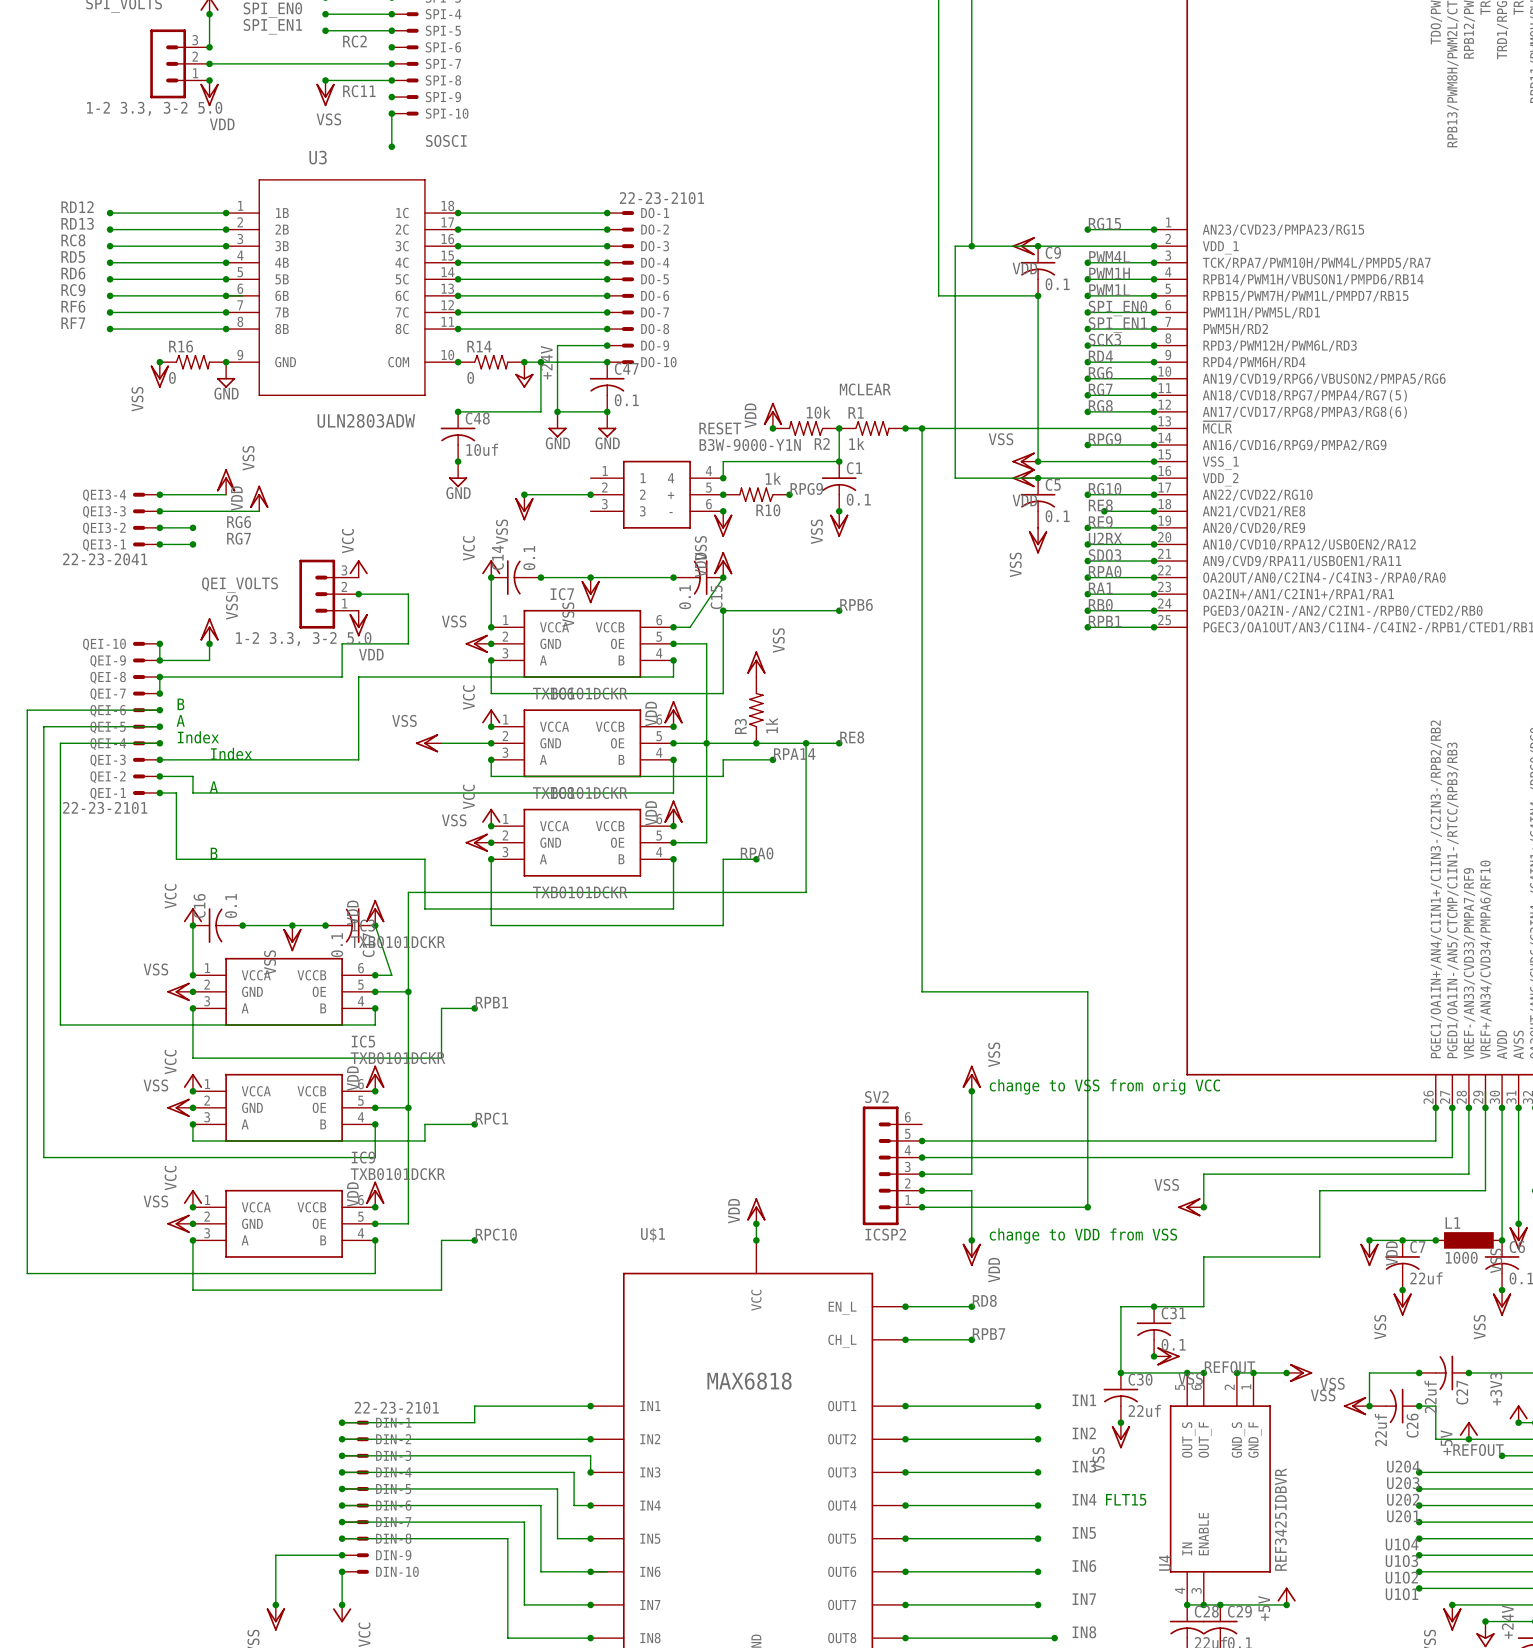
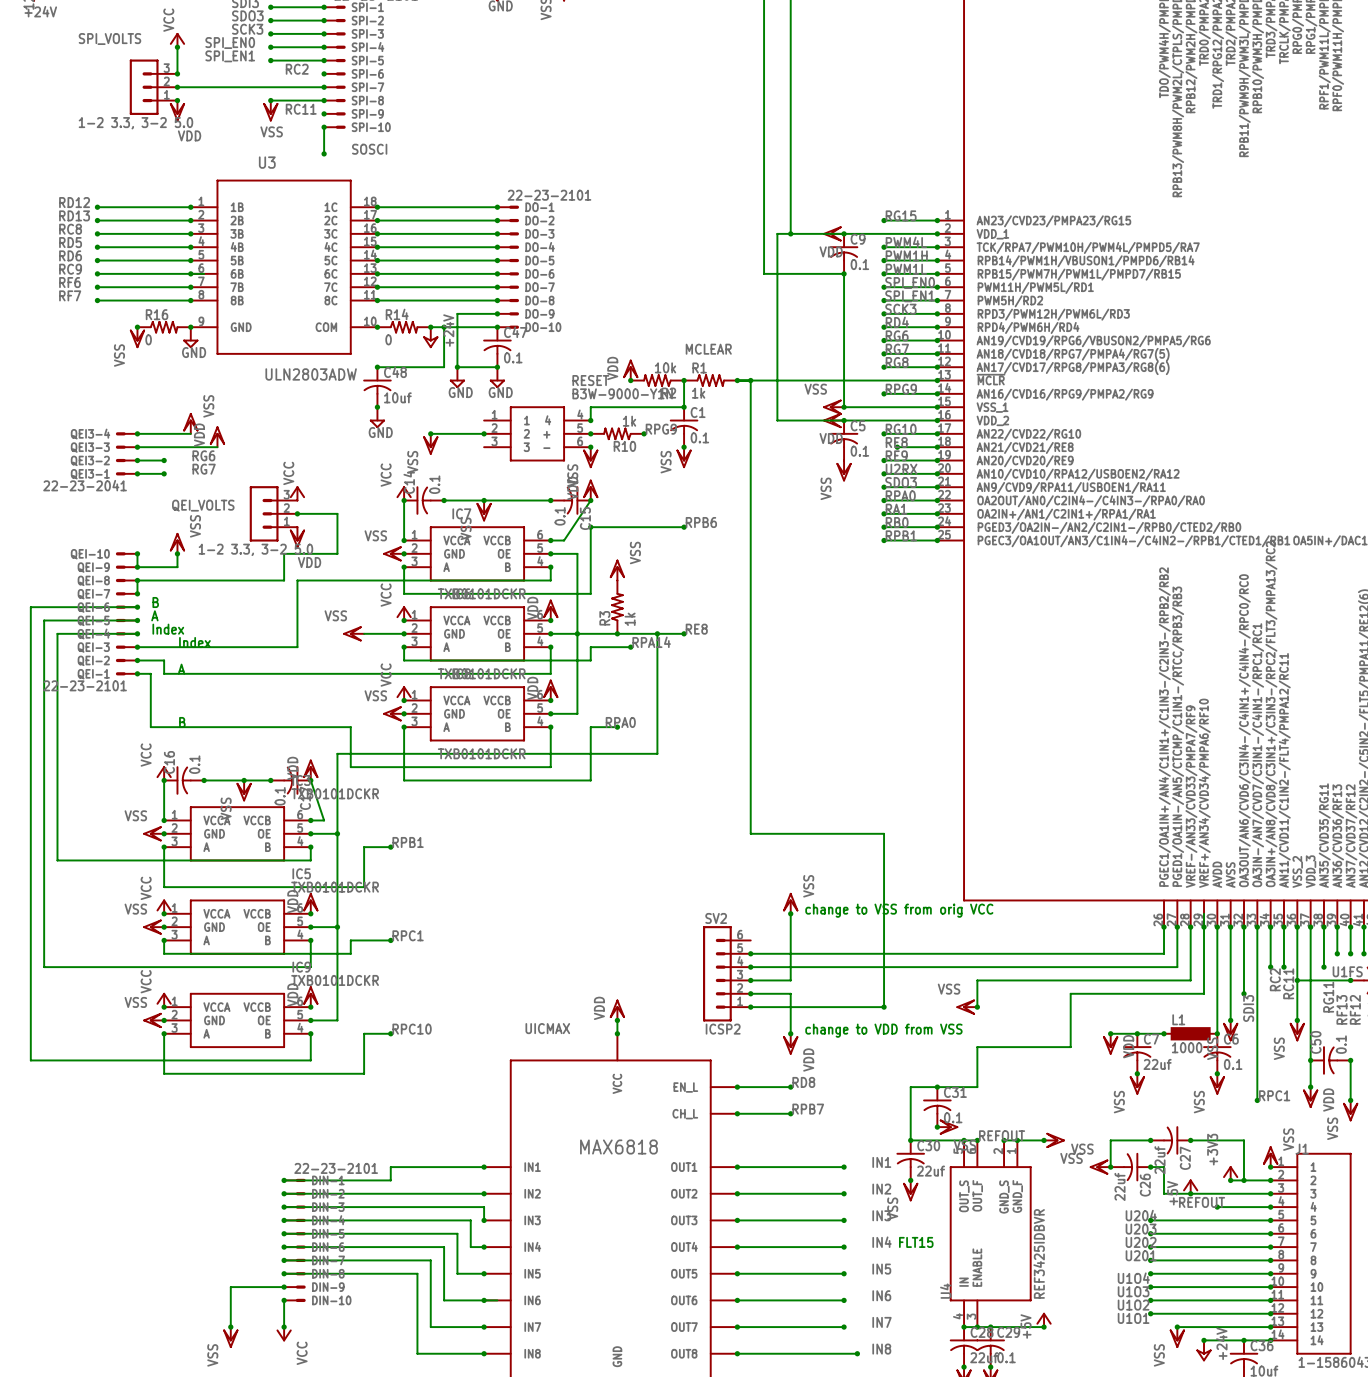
U$1 name: U$1 (653, 1234) -> UICMAX (547, 1028)

